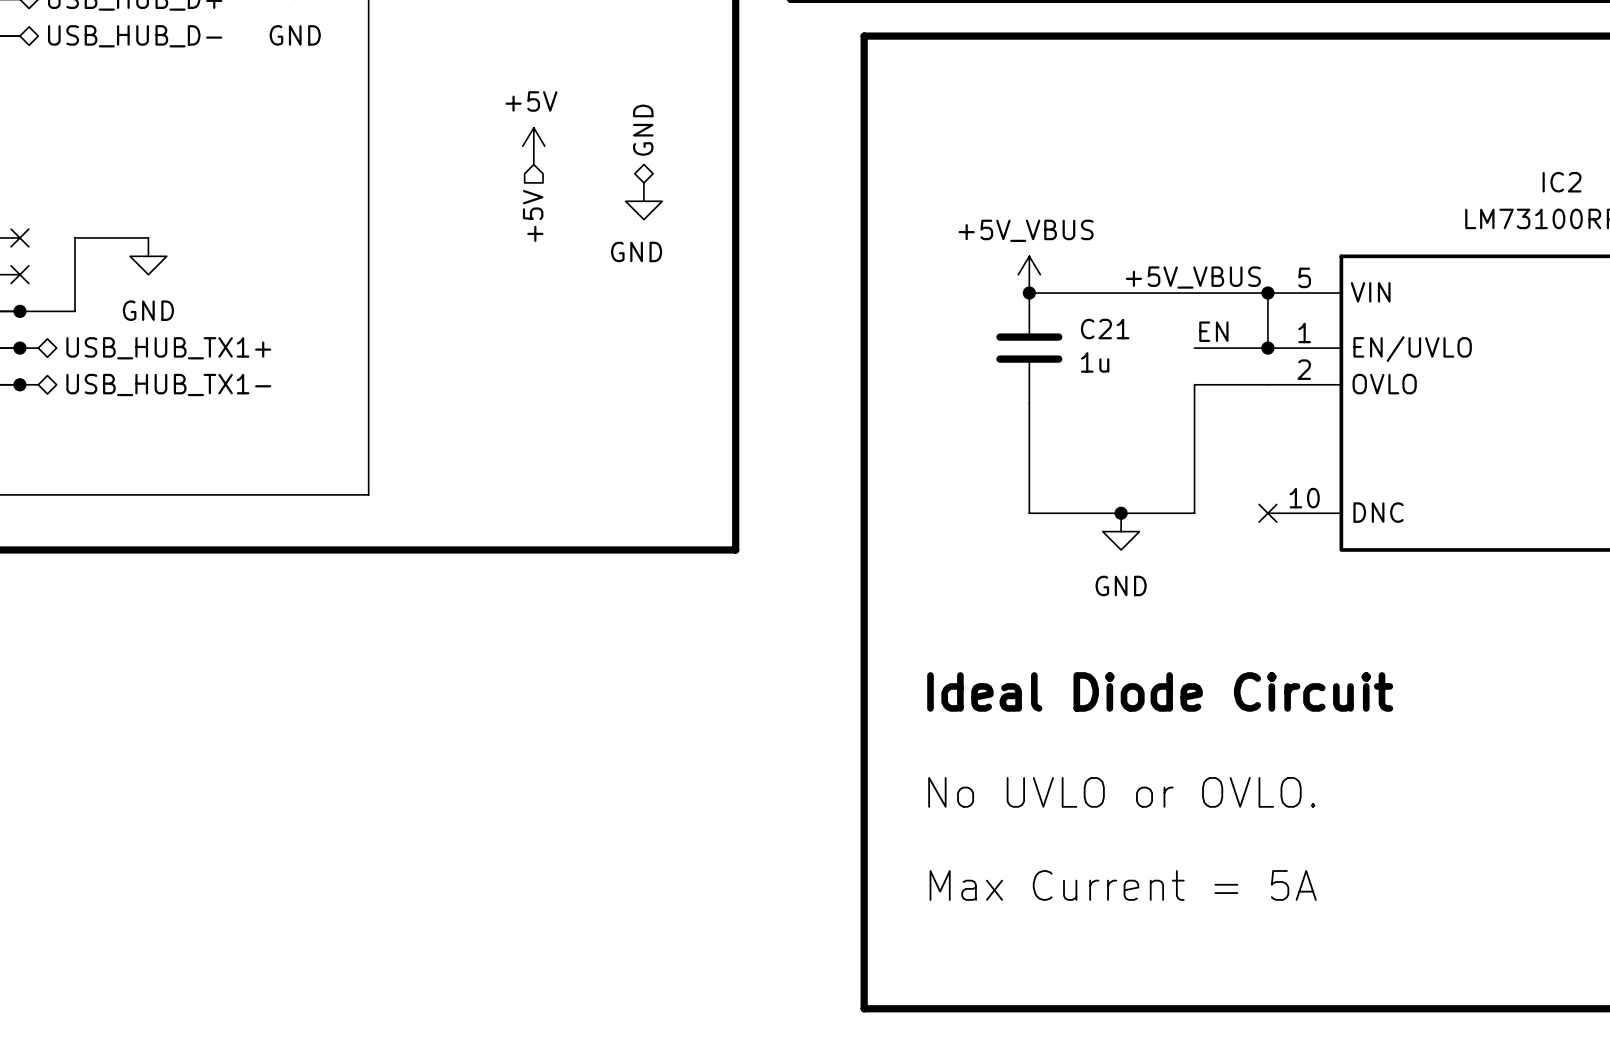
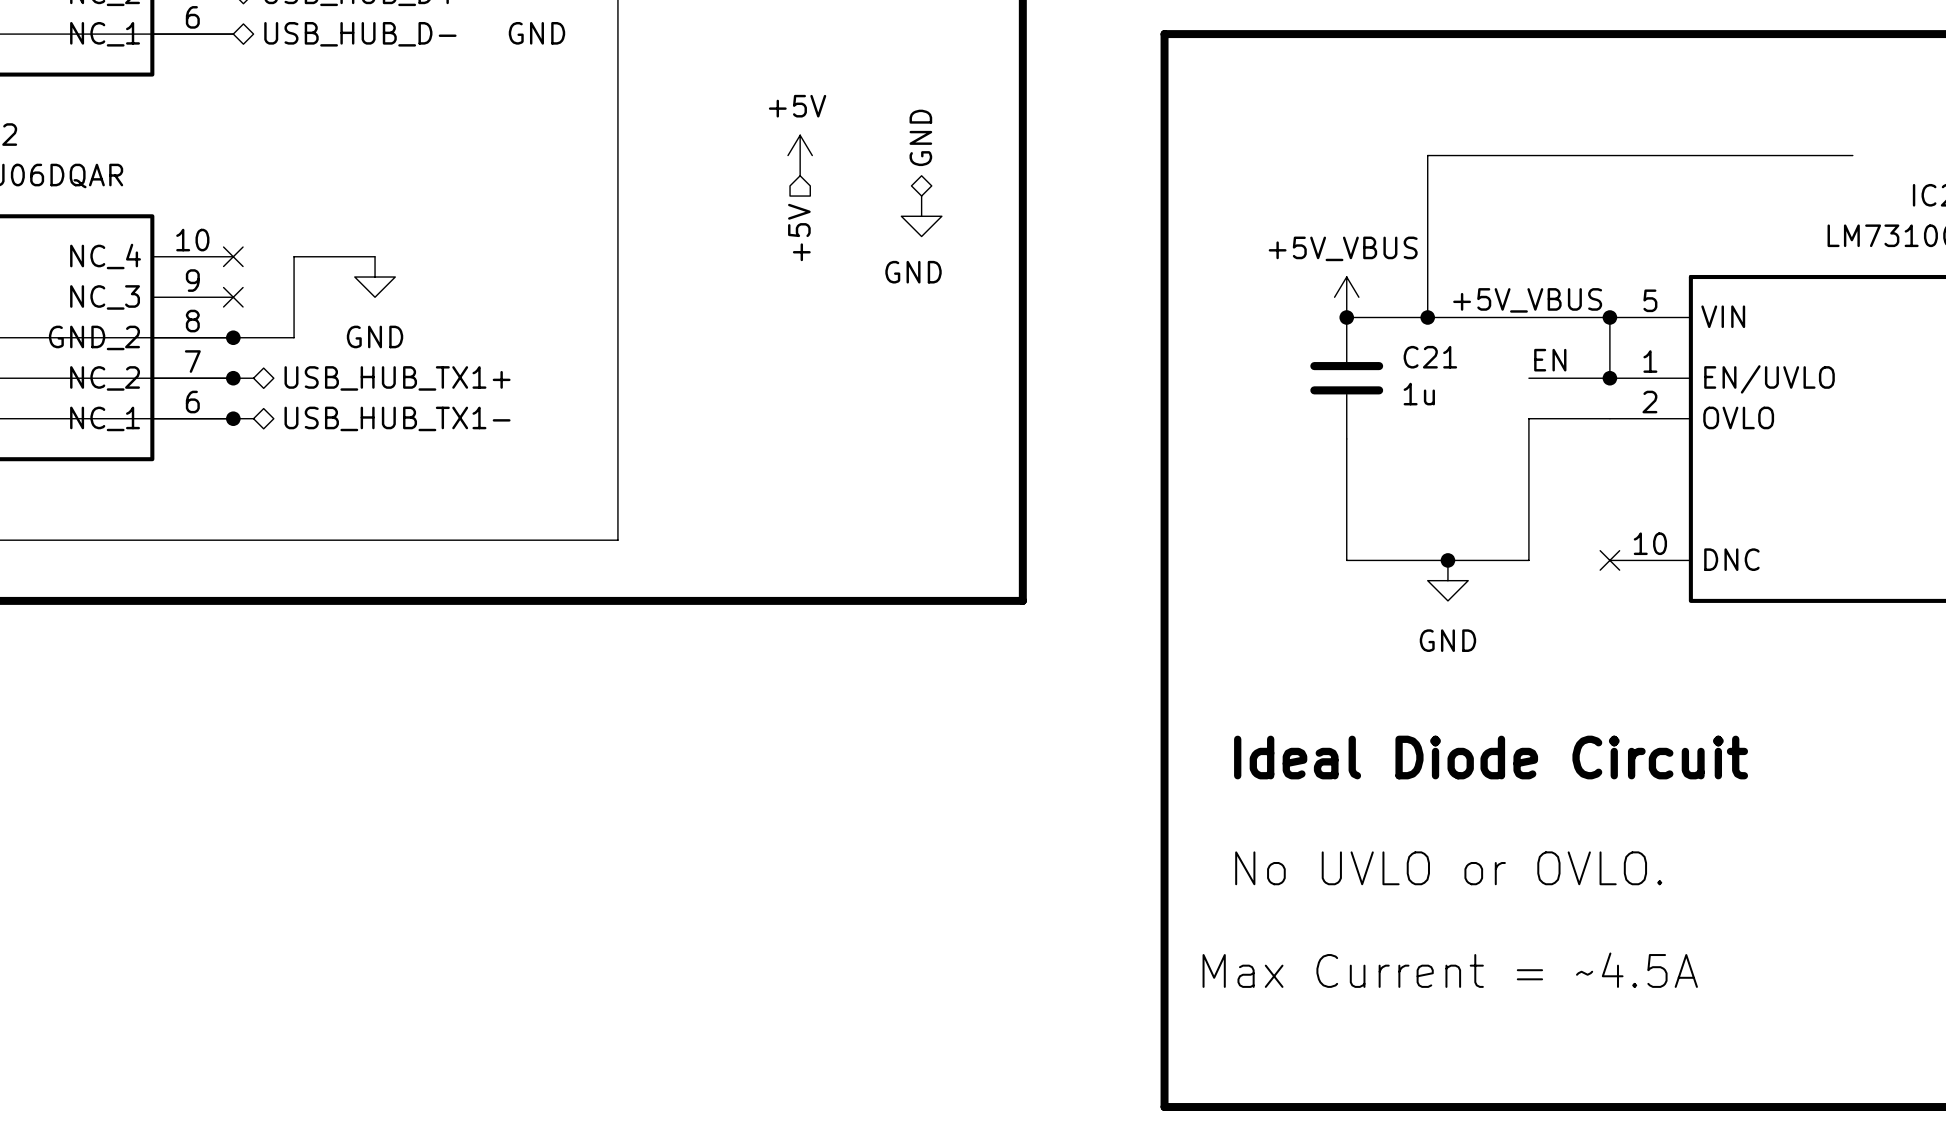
wire: none -> (1852, 155) (1427, 155) (1427, 317)
junction: none -> (1427, 317)
text: Max Current = 5A (1123, 885) -> Max Current = ~4.5A (1450, 970)

